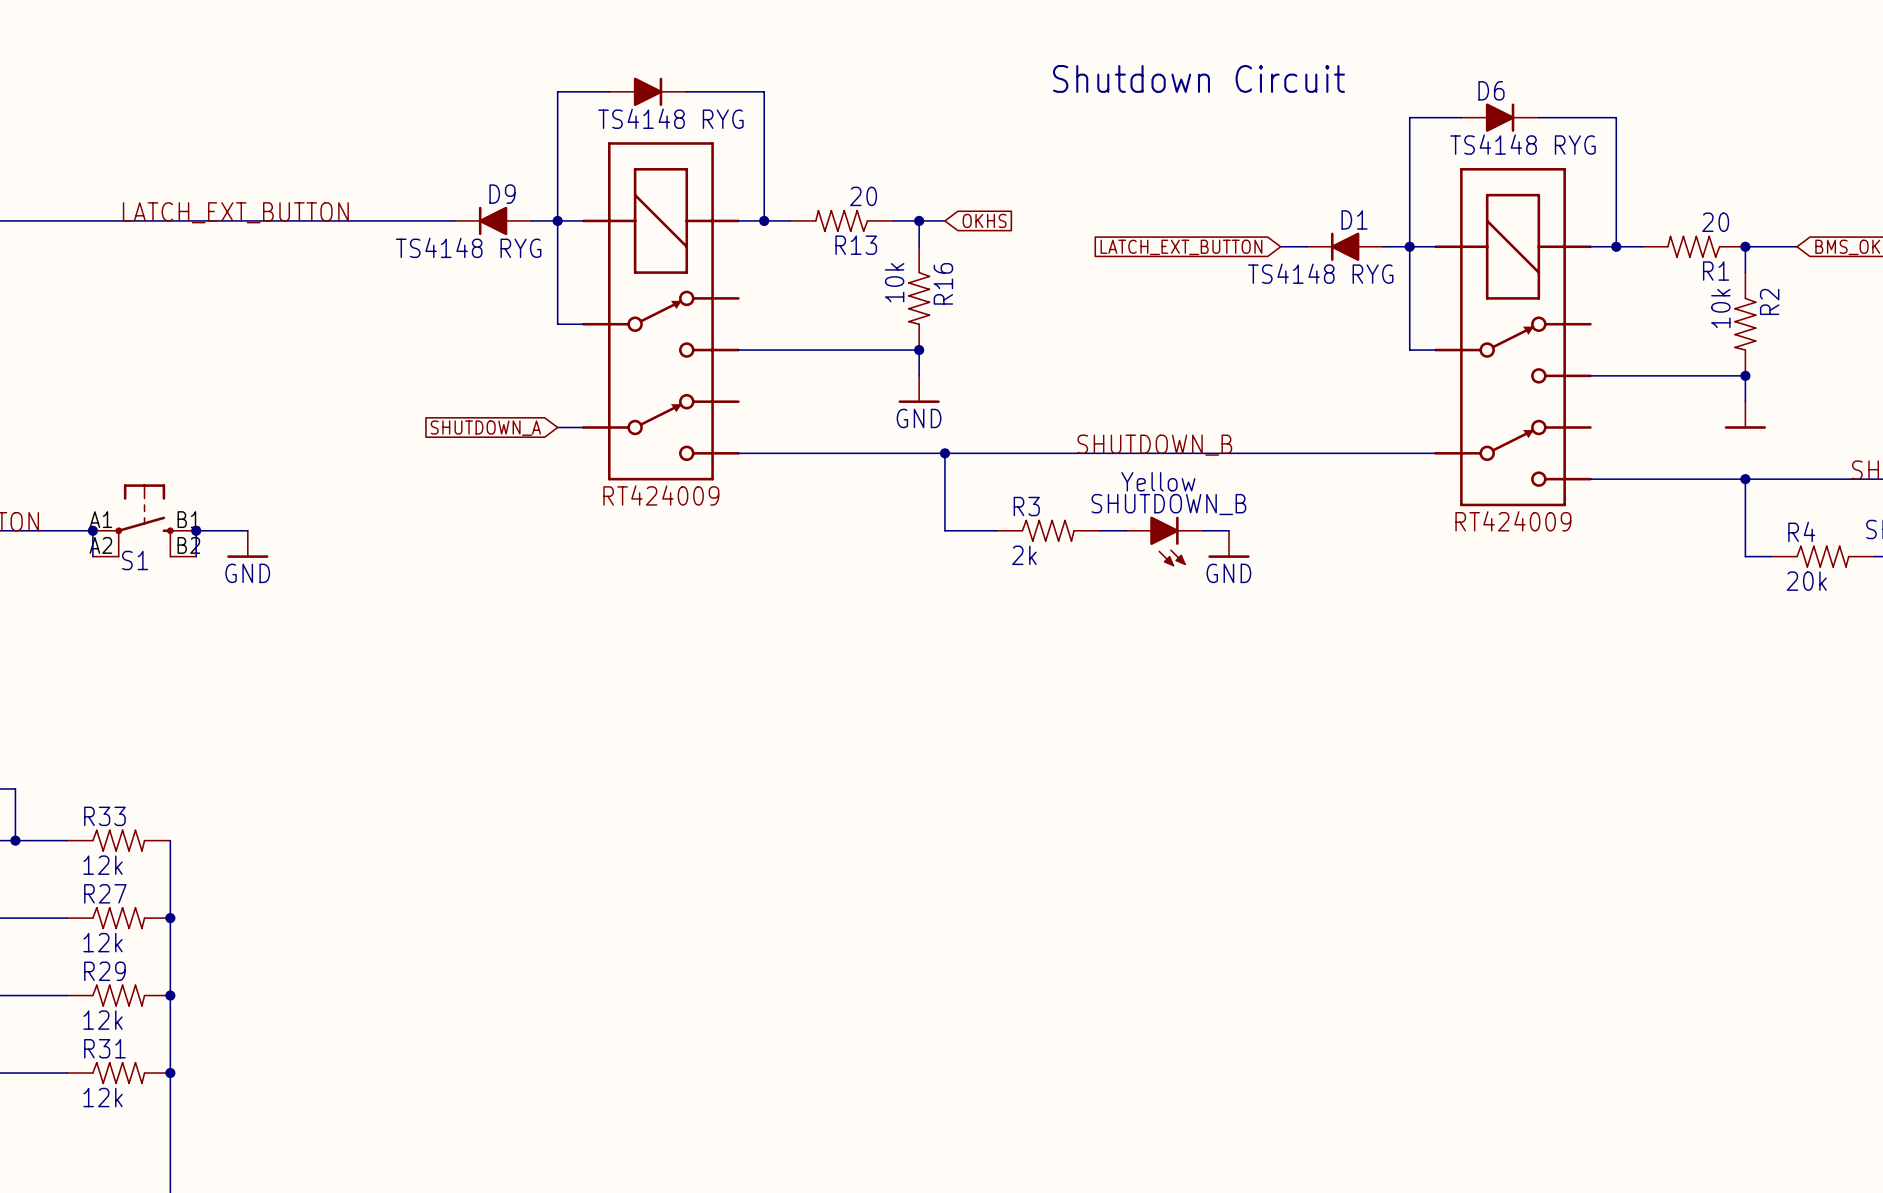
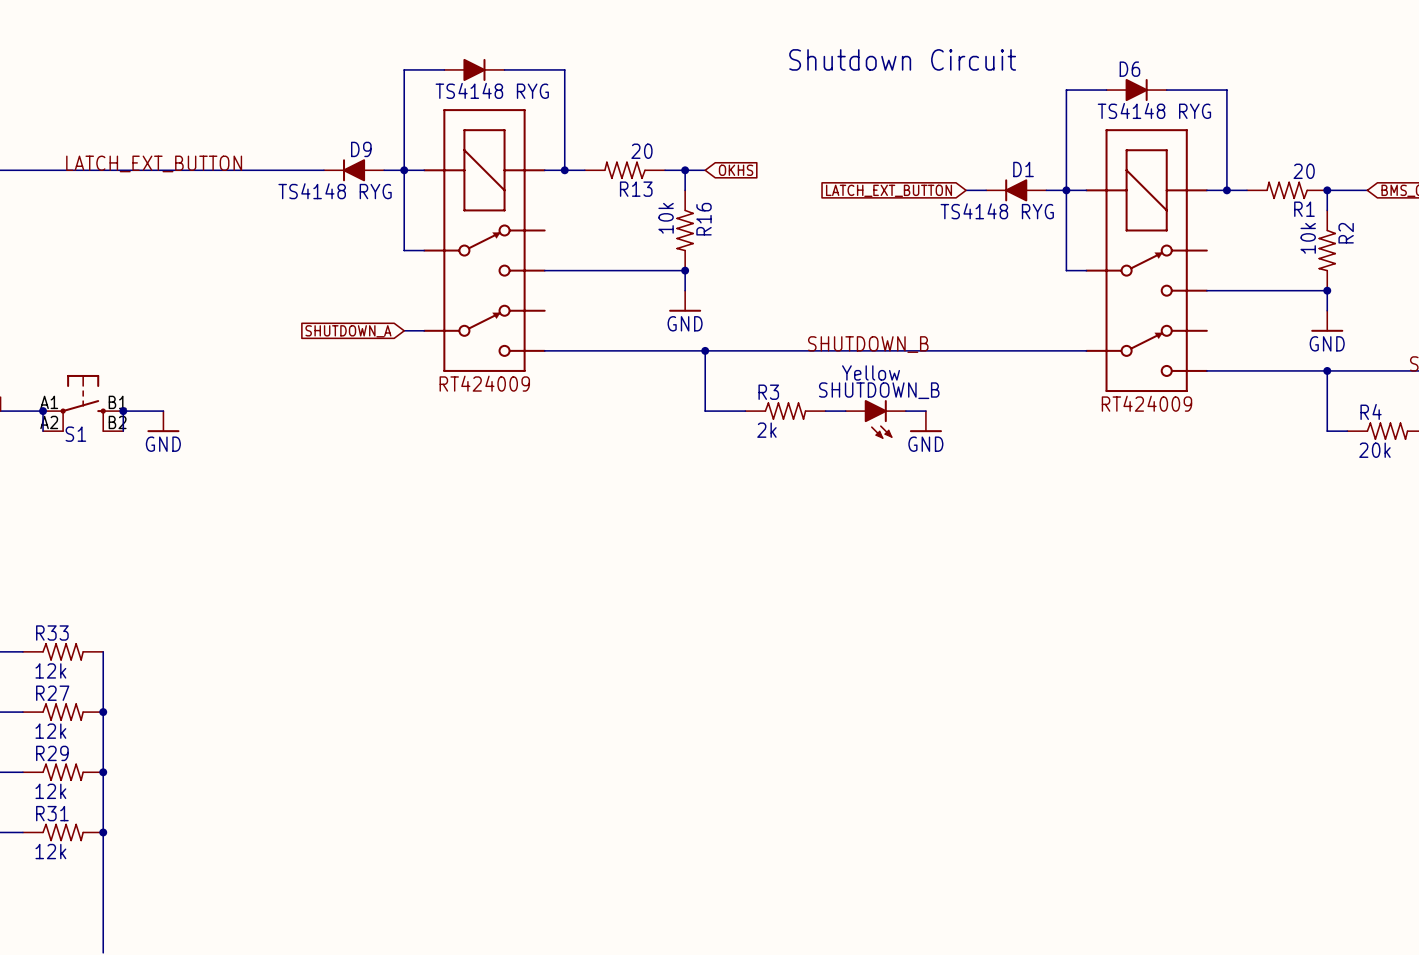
power symbol text: none -> GND (1327, 343)

